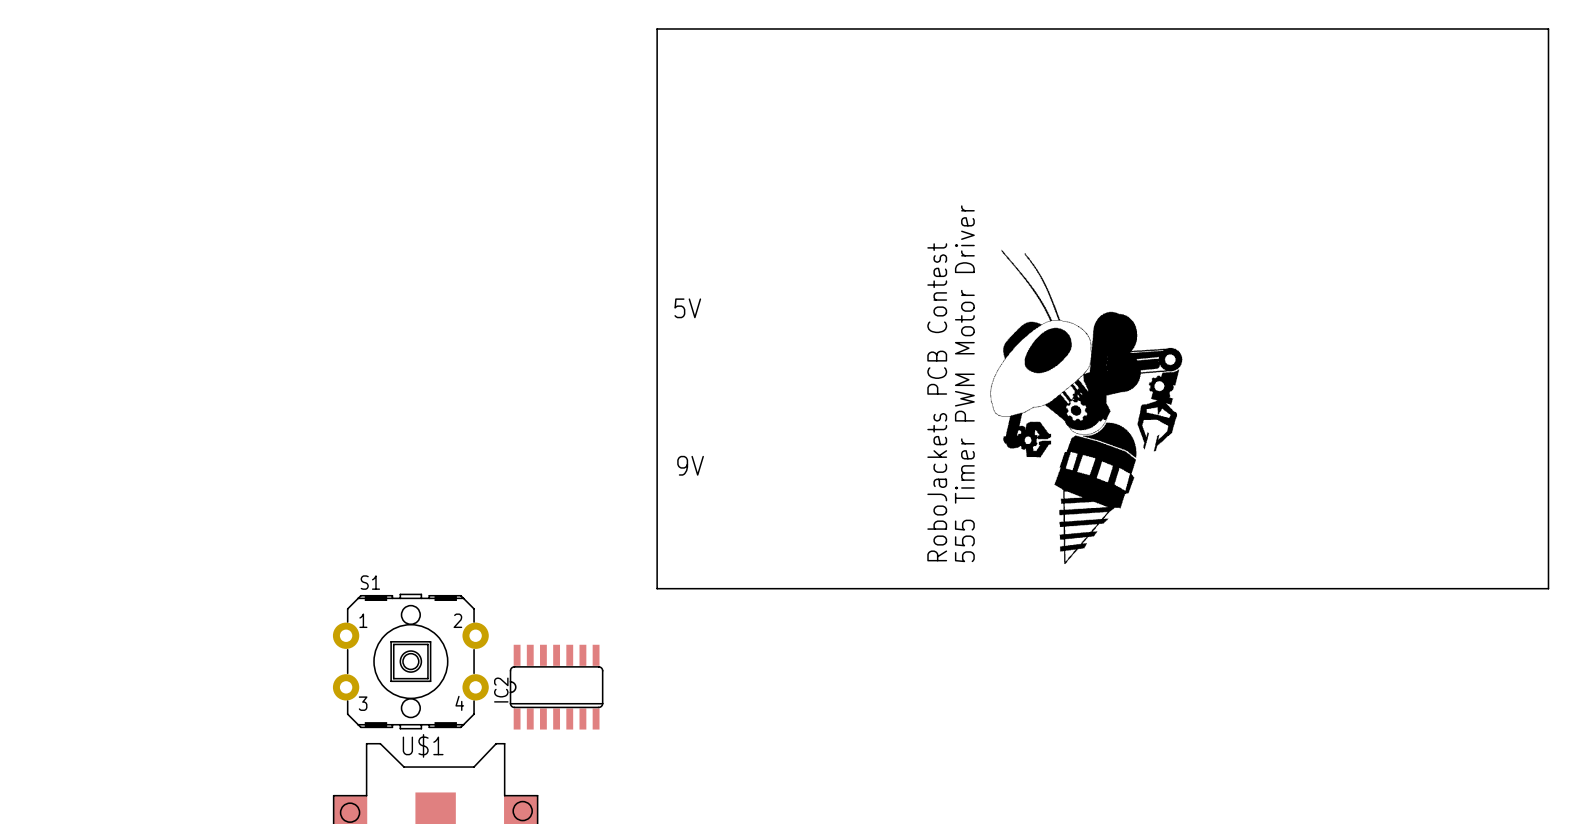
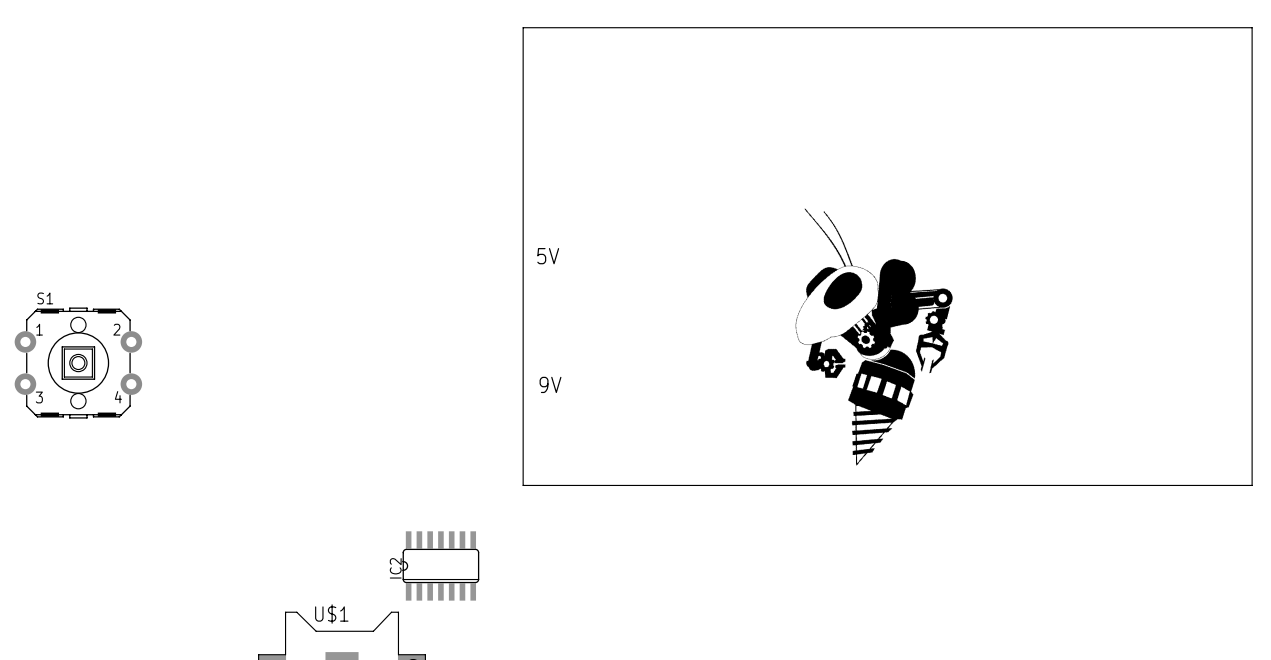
text: 555 Timer PWM Motor Driver (964, 383) -> none
text: RoboJackets PCB Contest (937, 402) -> none
S1 position: (410, 661) -> (78, 363)

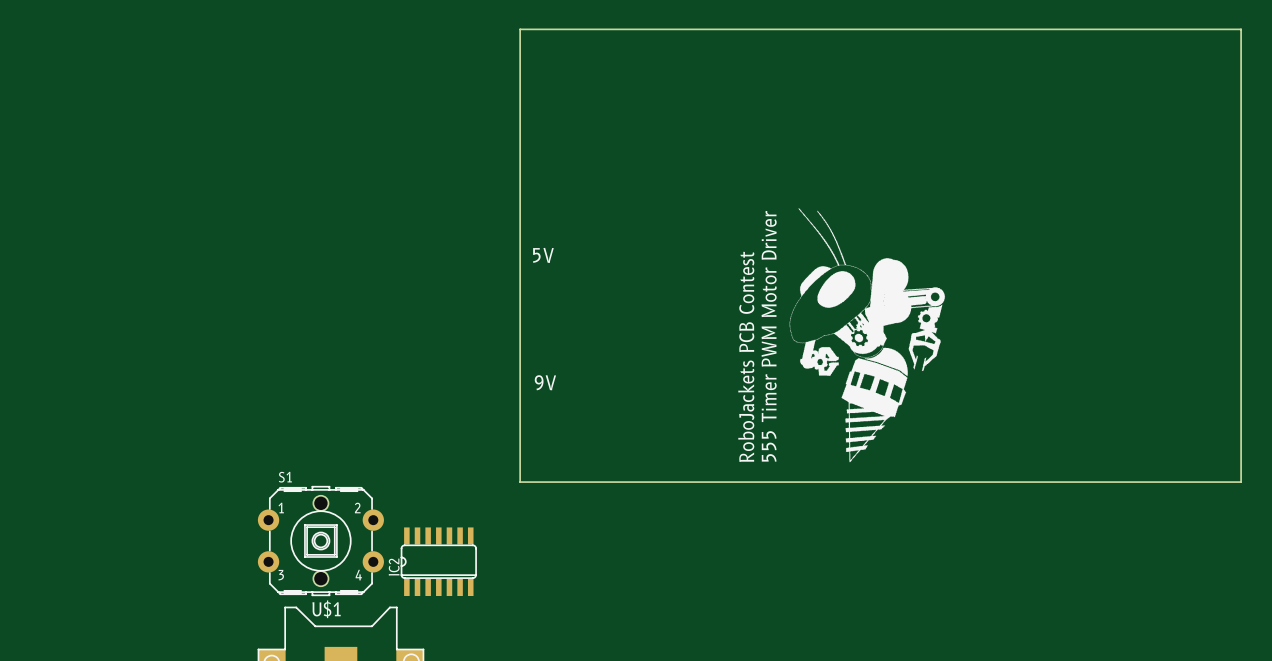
text: none -> 555 Timer PWM Motor Driver (769, 336)
text: none -> RoboJackets PCB Contest (746, 356)
S1 position: (78, 363) -> (320, 541)

